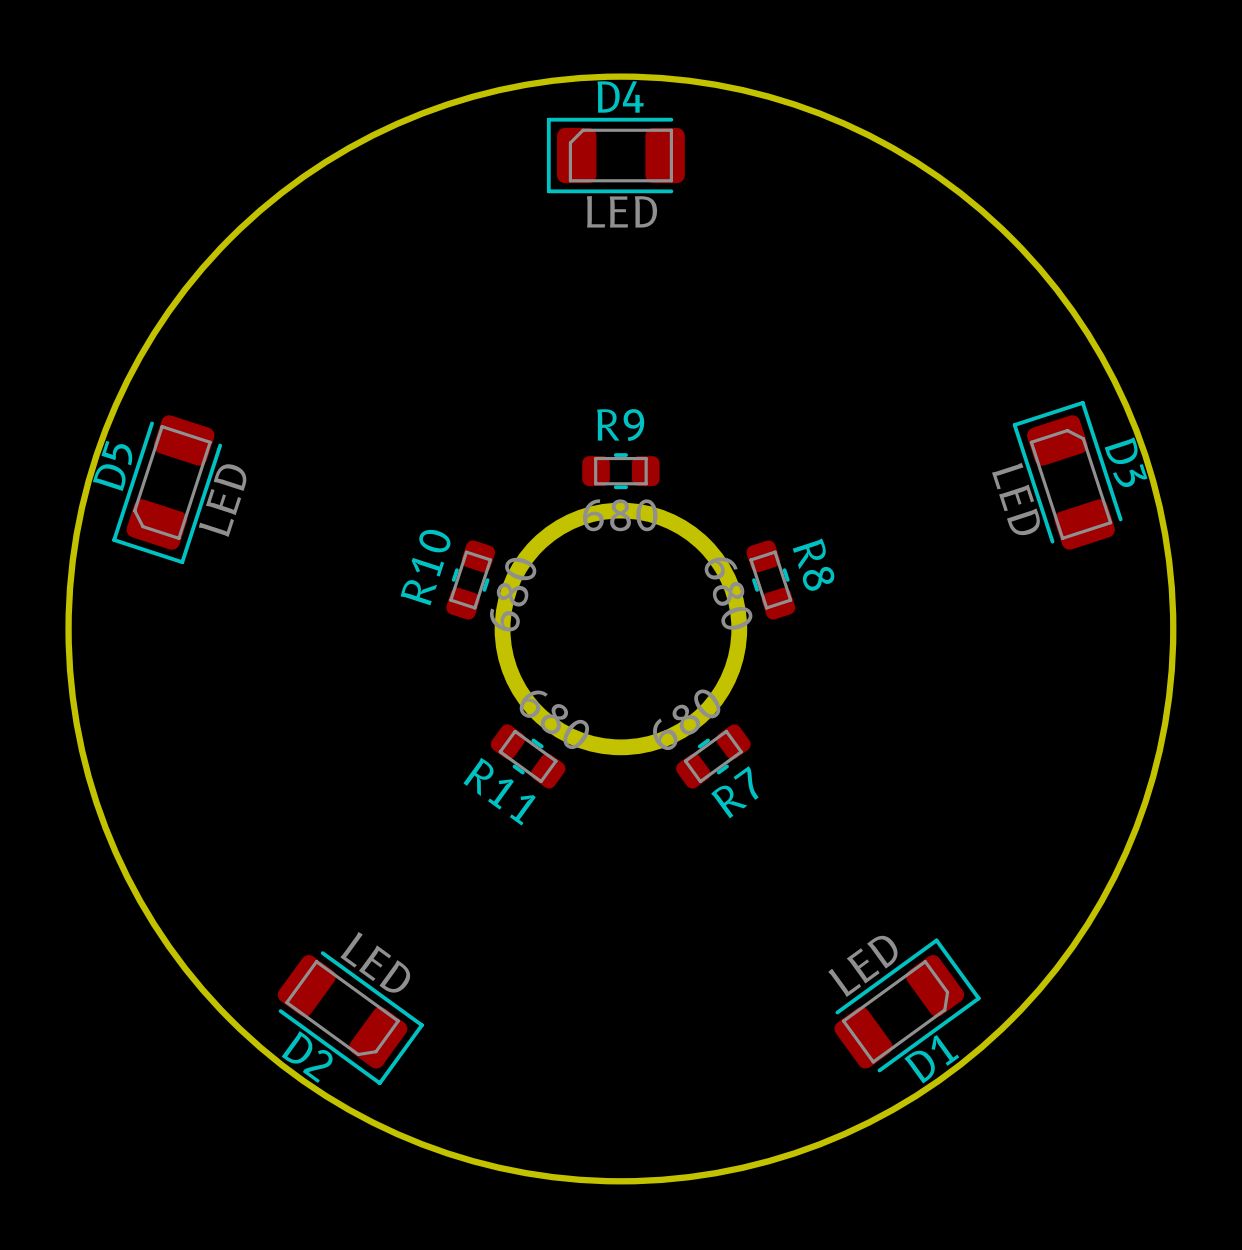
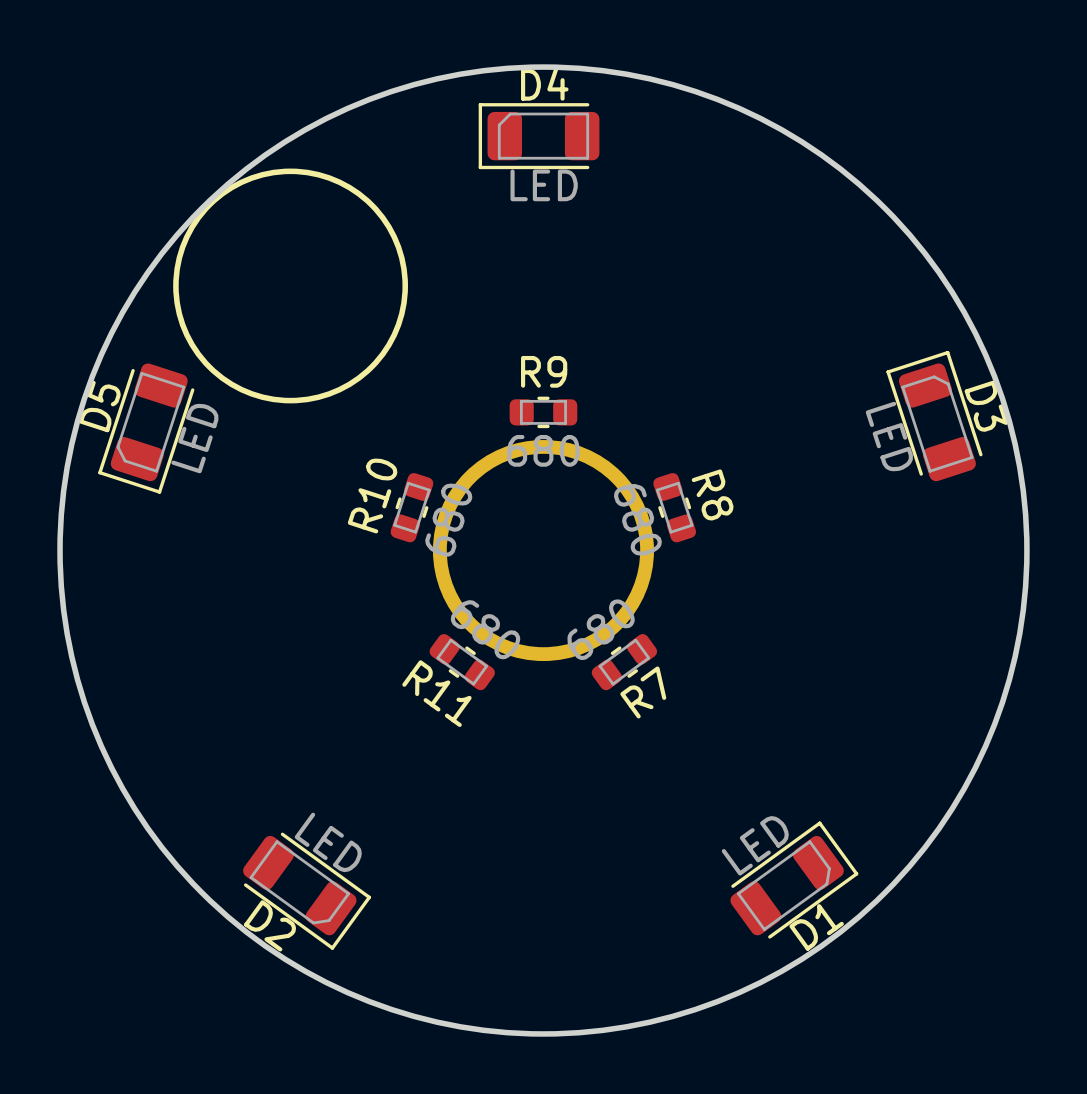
drawing: none -> [173, 168, 408, 404]

